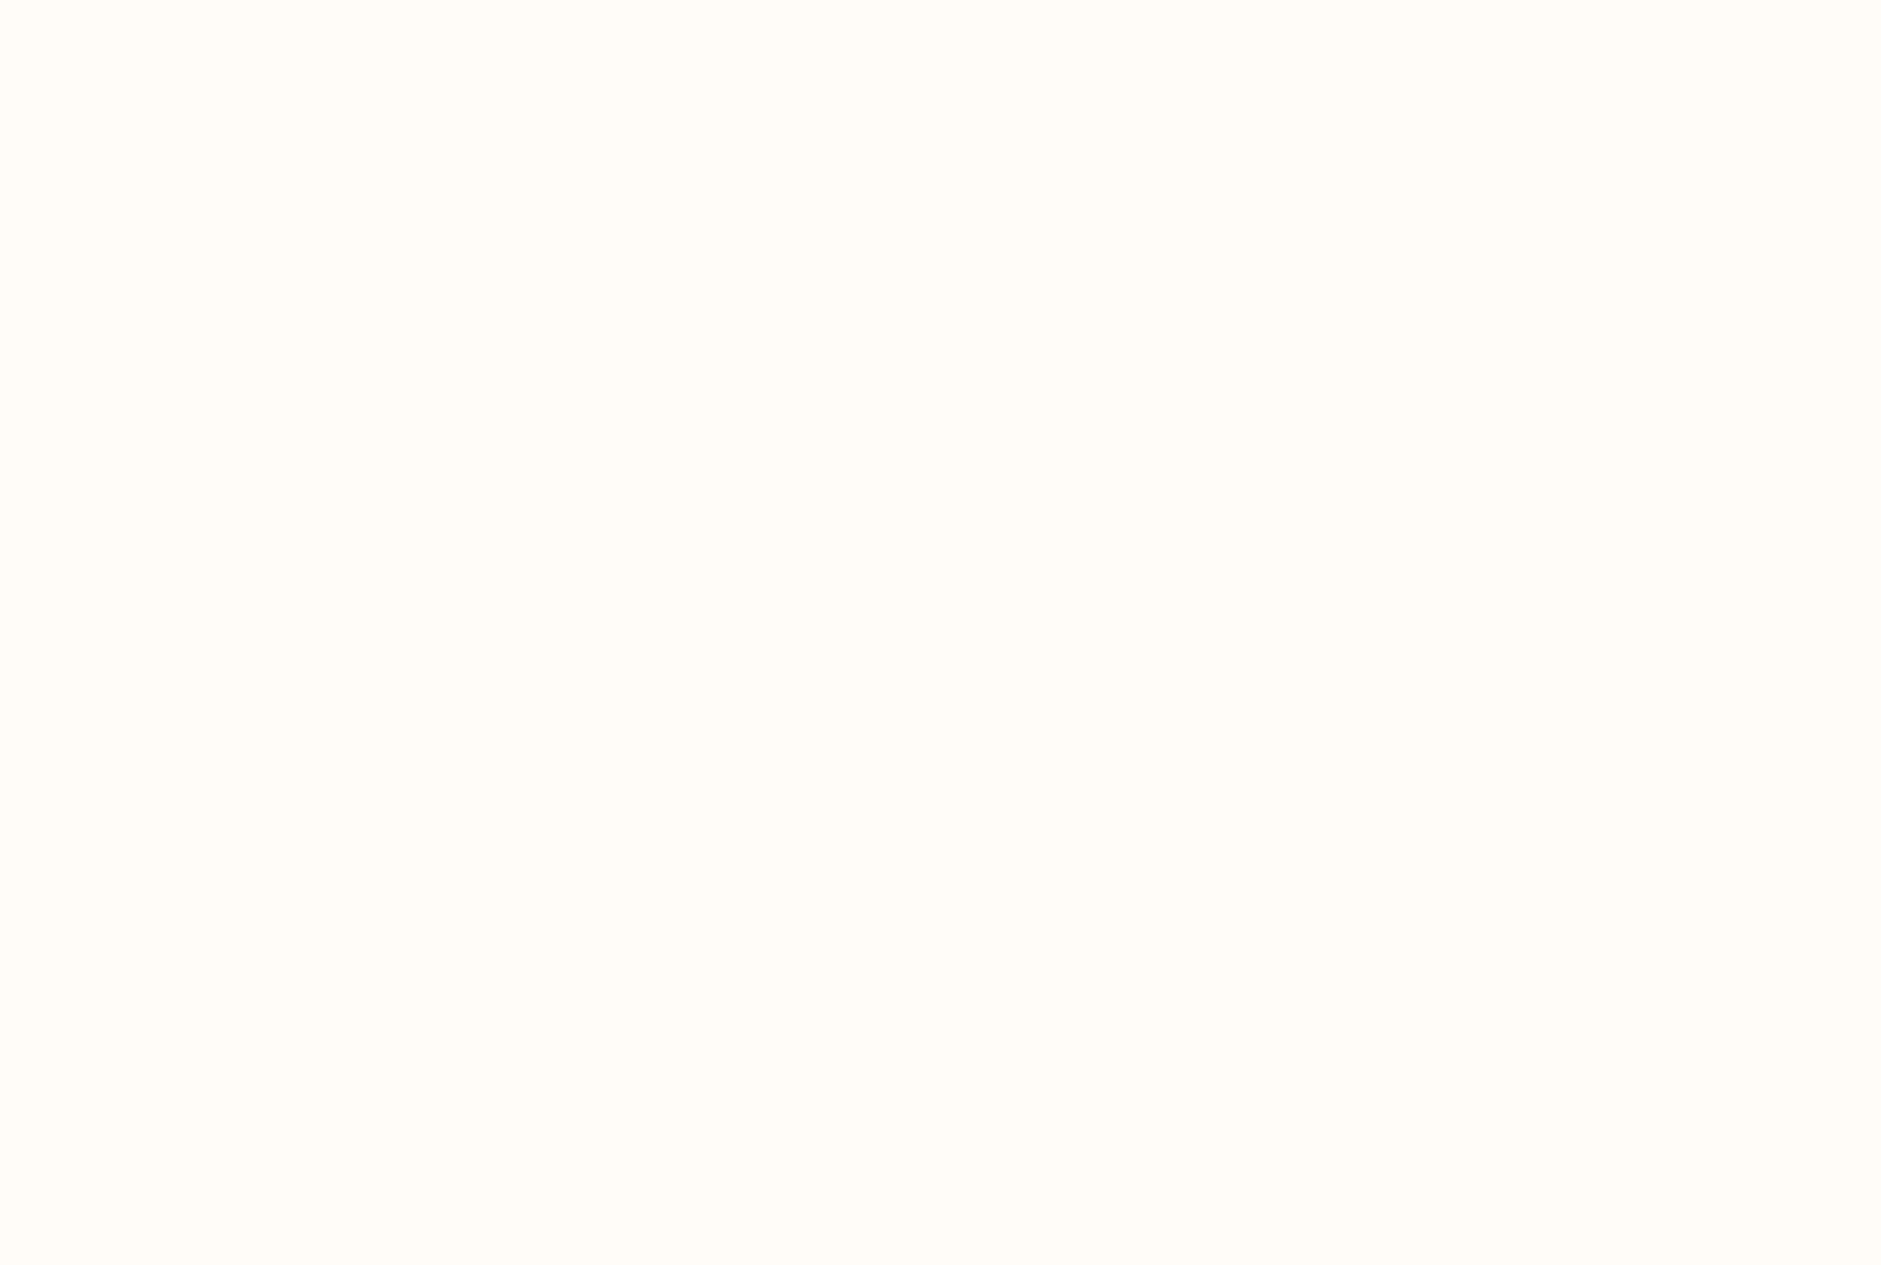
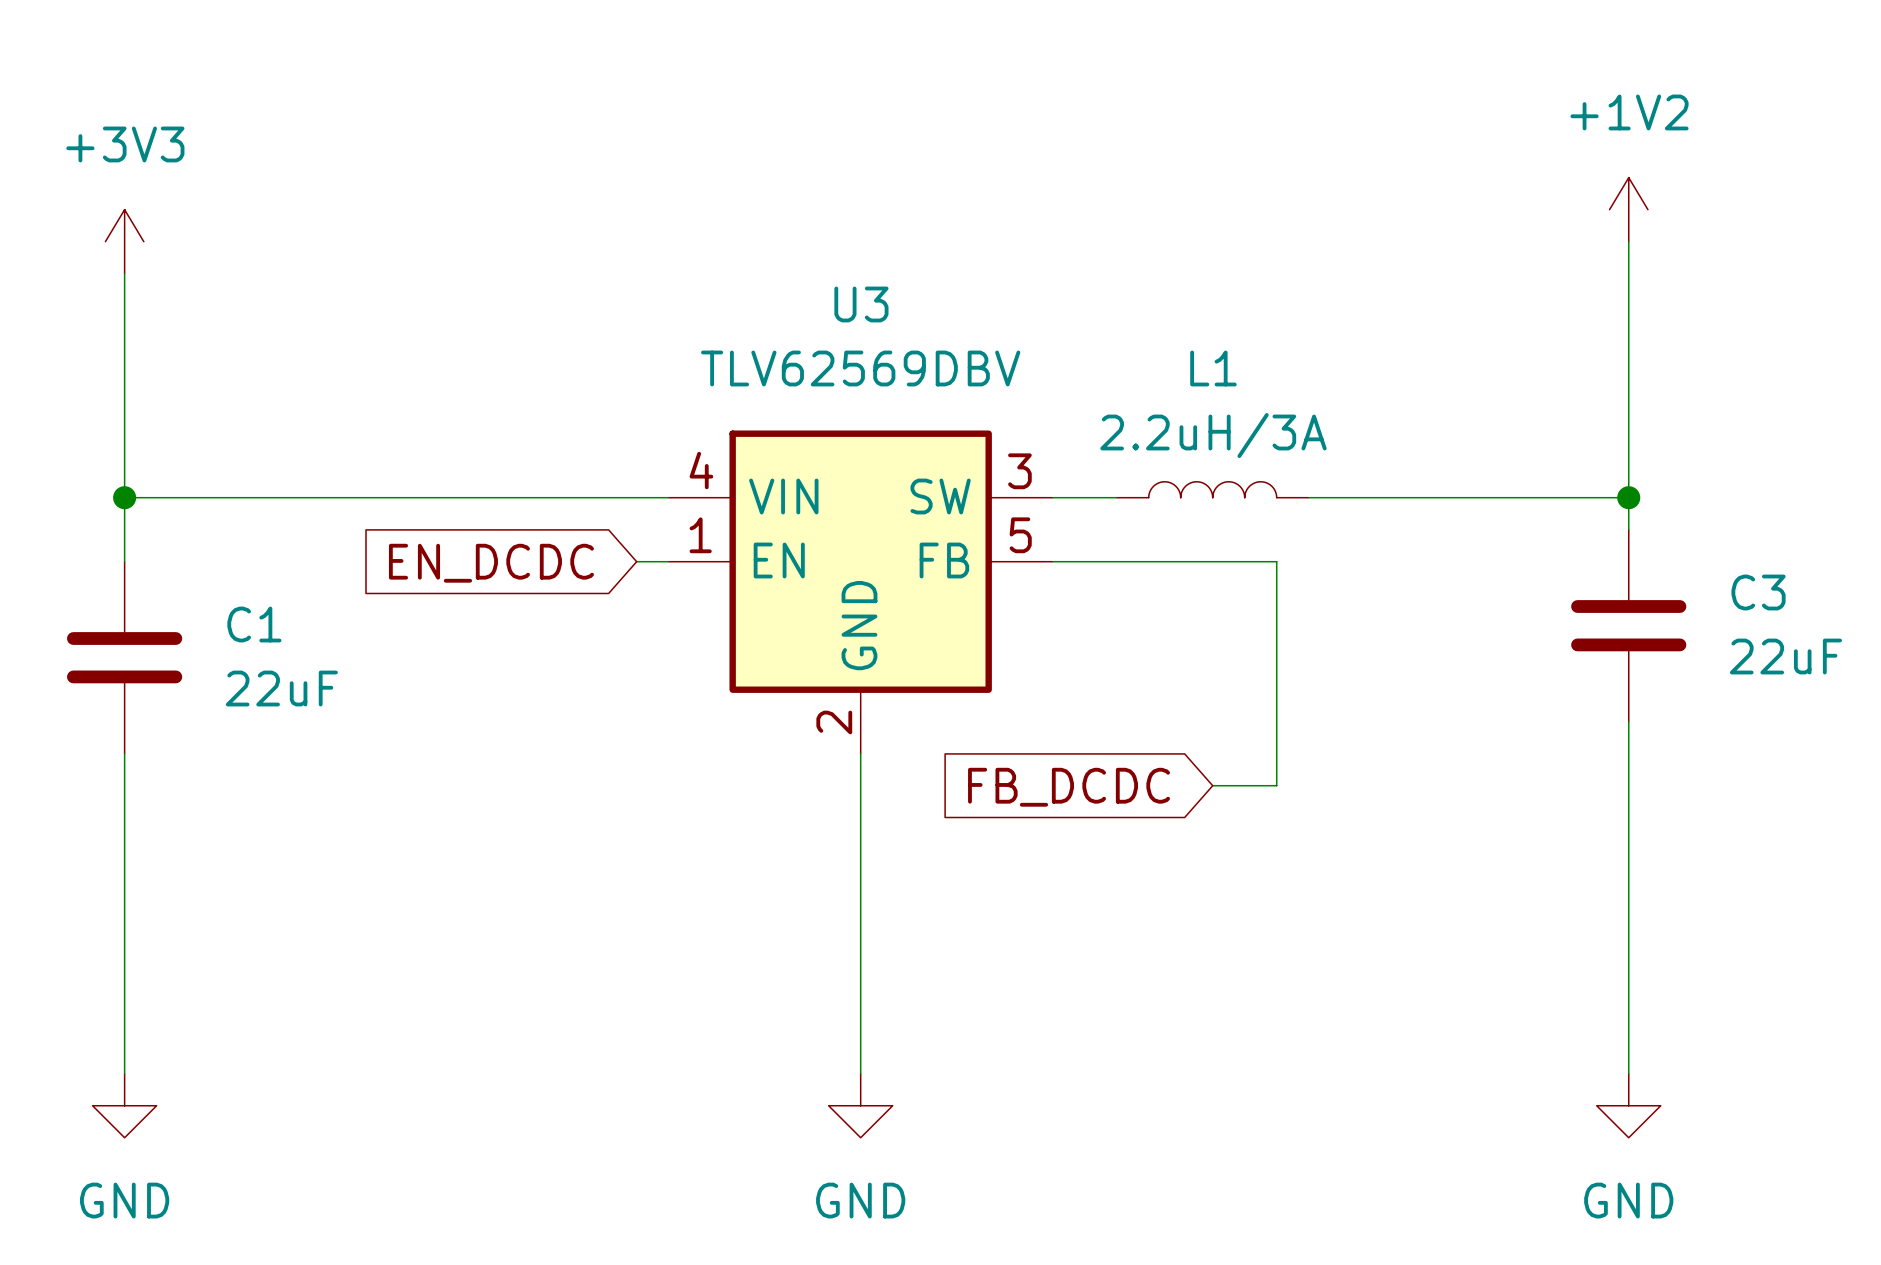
power symbol: none -> +1V2 (1628, 209)
power symbol: none -> +3V3 (124, 241)
wire: none -> (1628, 241) (1628, 529)
wire: none -> (124, 273) (124, 561)
L1: none -> 2.2uH/3A (1212, 489)
wire: none -> (124, 497) (668, 497)
junction: none -> (124, 497)
wire: none -> (1052, 497) (1116, 497)
wire: none -> (1308, 497) (1628, 497)
junction: none -> (1628, 497)
wire: none -> (636, 561) (668, 561)
wire: none -> (1052, 561) (1276, 561) (1276, 785) (1212, 785)
global label: none -> EN_DCDC (491, 563)
U3: none -> TLV62569DBV (860, 592)
C3: none -> 22uF (1628, 625)
C1: none -> 22uF (124, 657)
wire: none -> (1628, 721) (1628, 1073)
wire: none -> (124, 753) (124, 1073)
wire: none -> (860, 753) (860, 1073)
global label: none -> FB_DCDC (1069, 787)
power symbol: none -> GND (124, 1105)
power symbol: none -> GND (860, 1105)
power symbol: none -> GND (1628, 1105)

